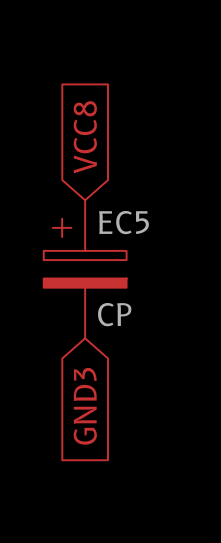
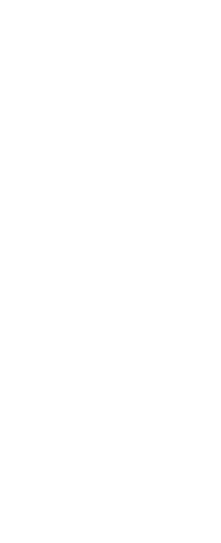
global label: VCC8 (85, 137) -> none
EC5: CP (85, 269) -> none
global label: GND3 (85, 406) -> none

